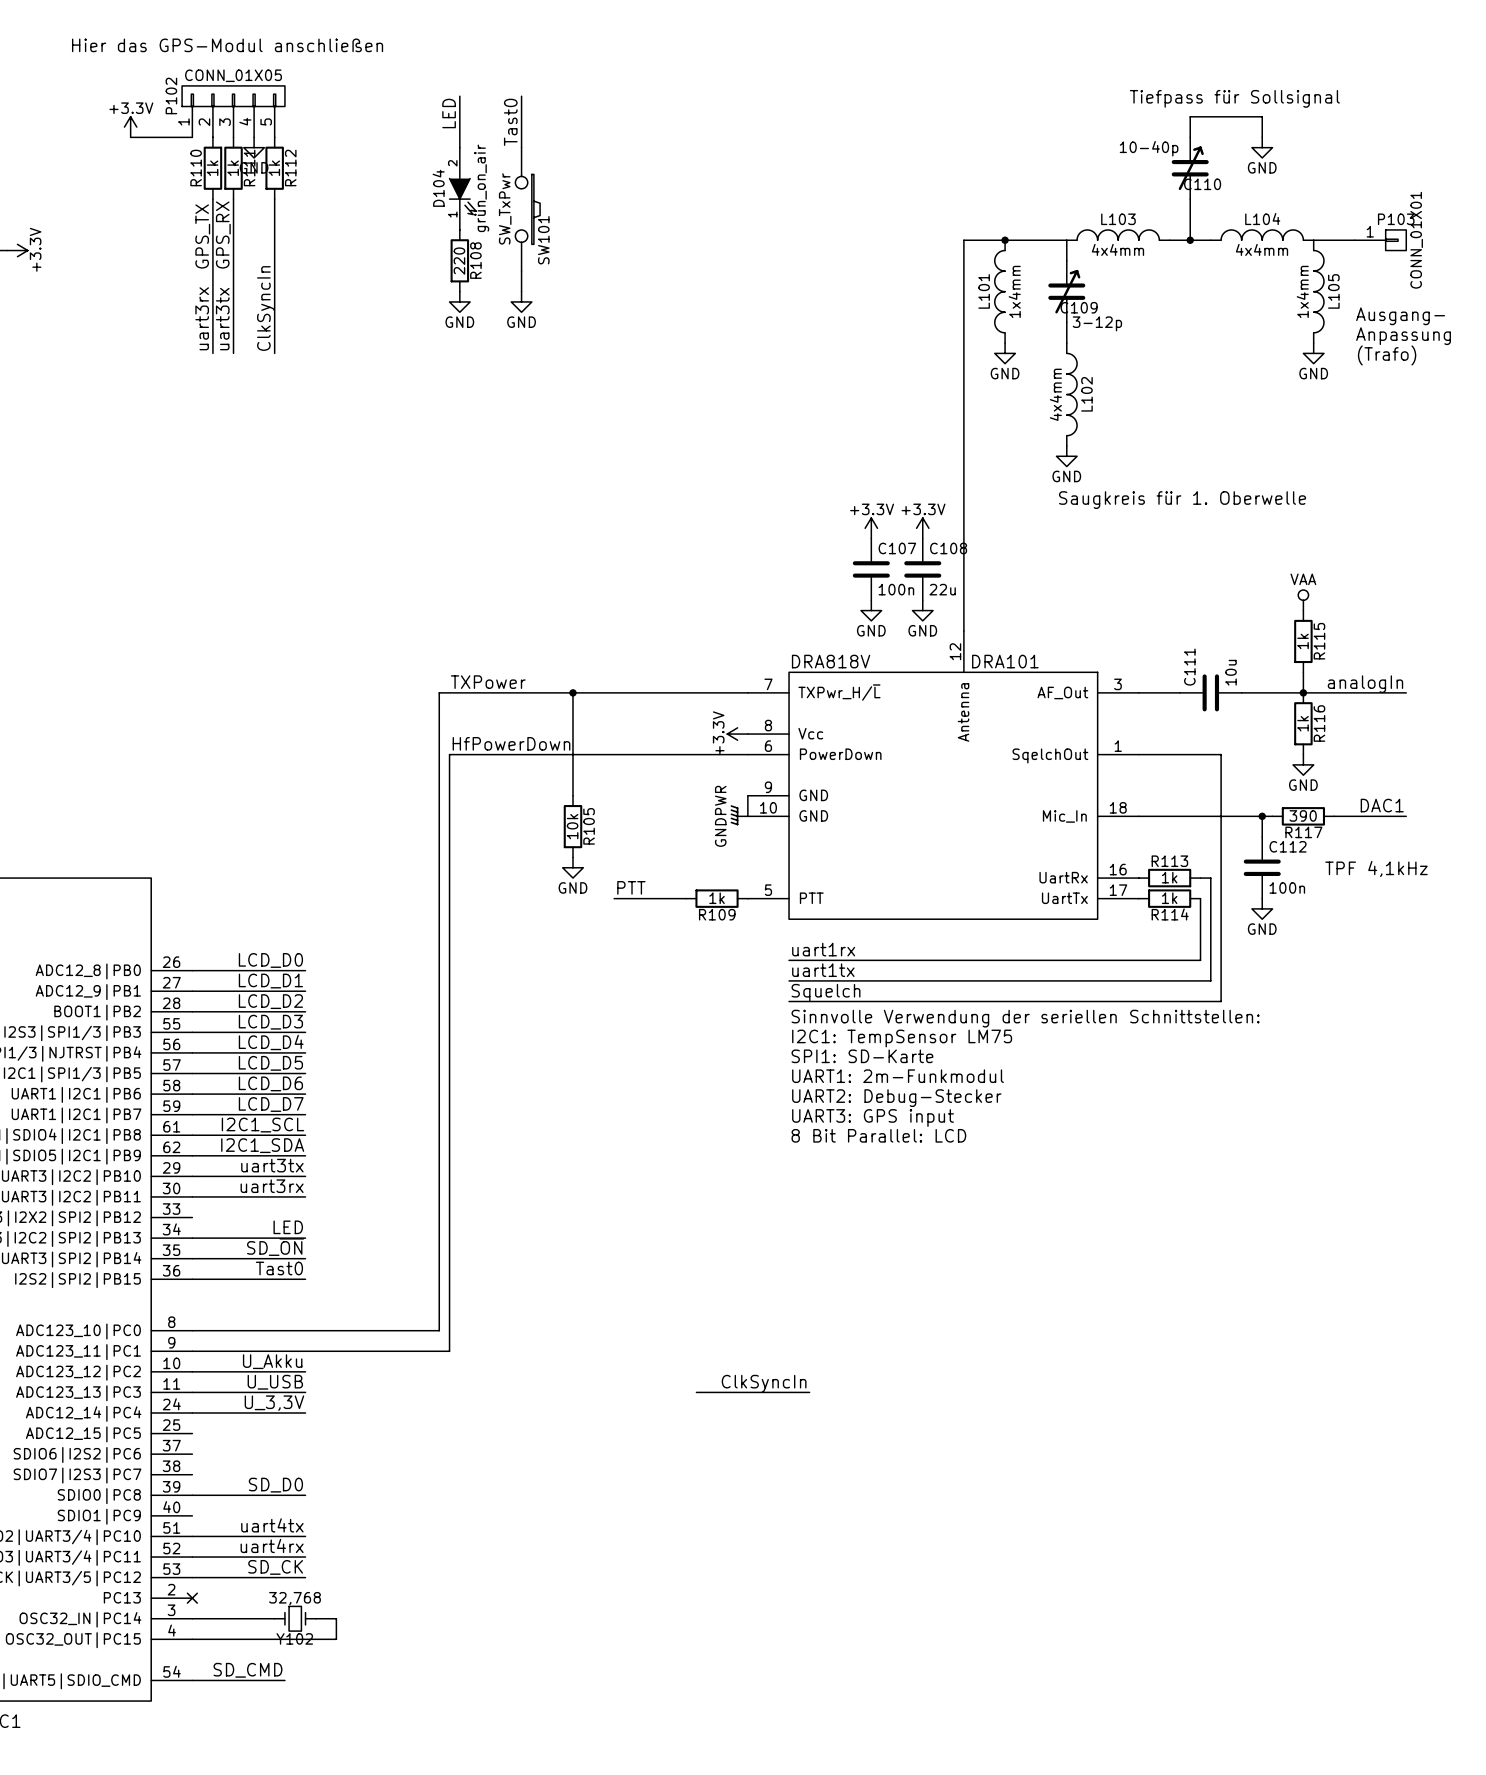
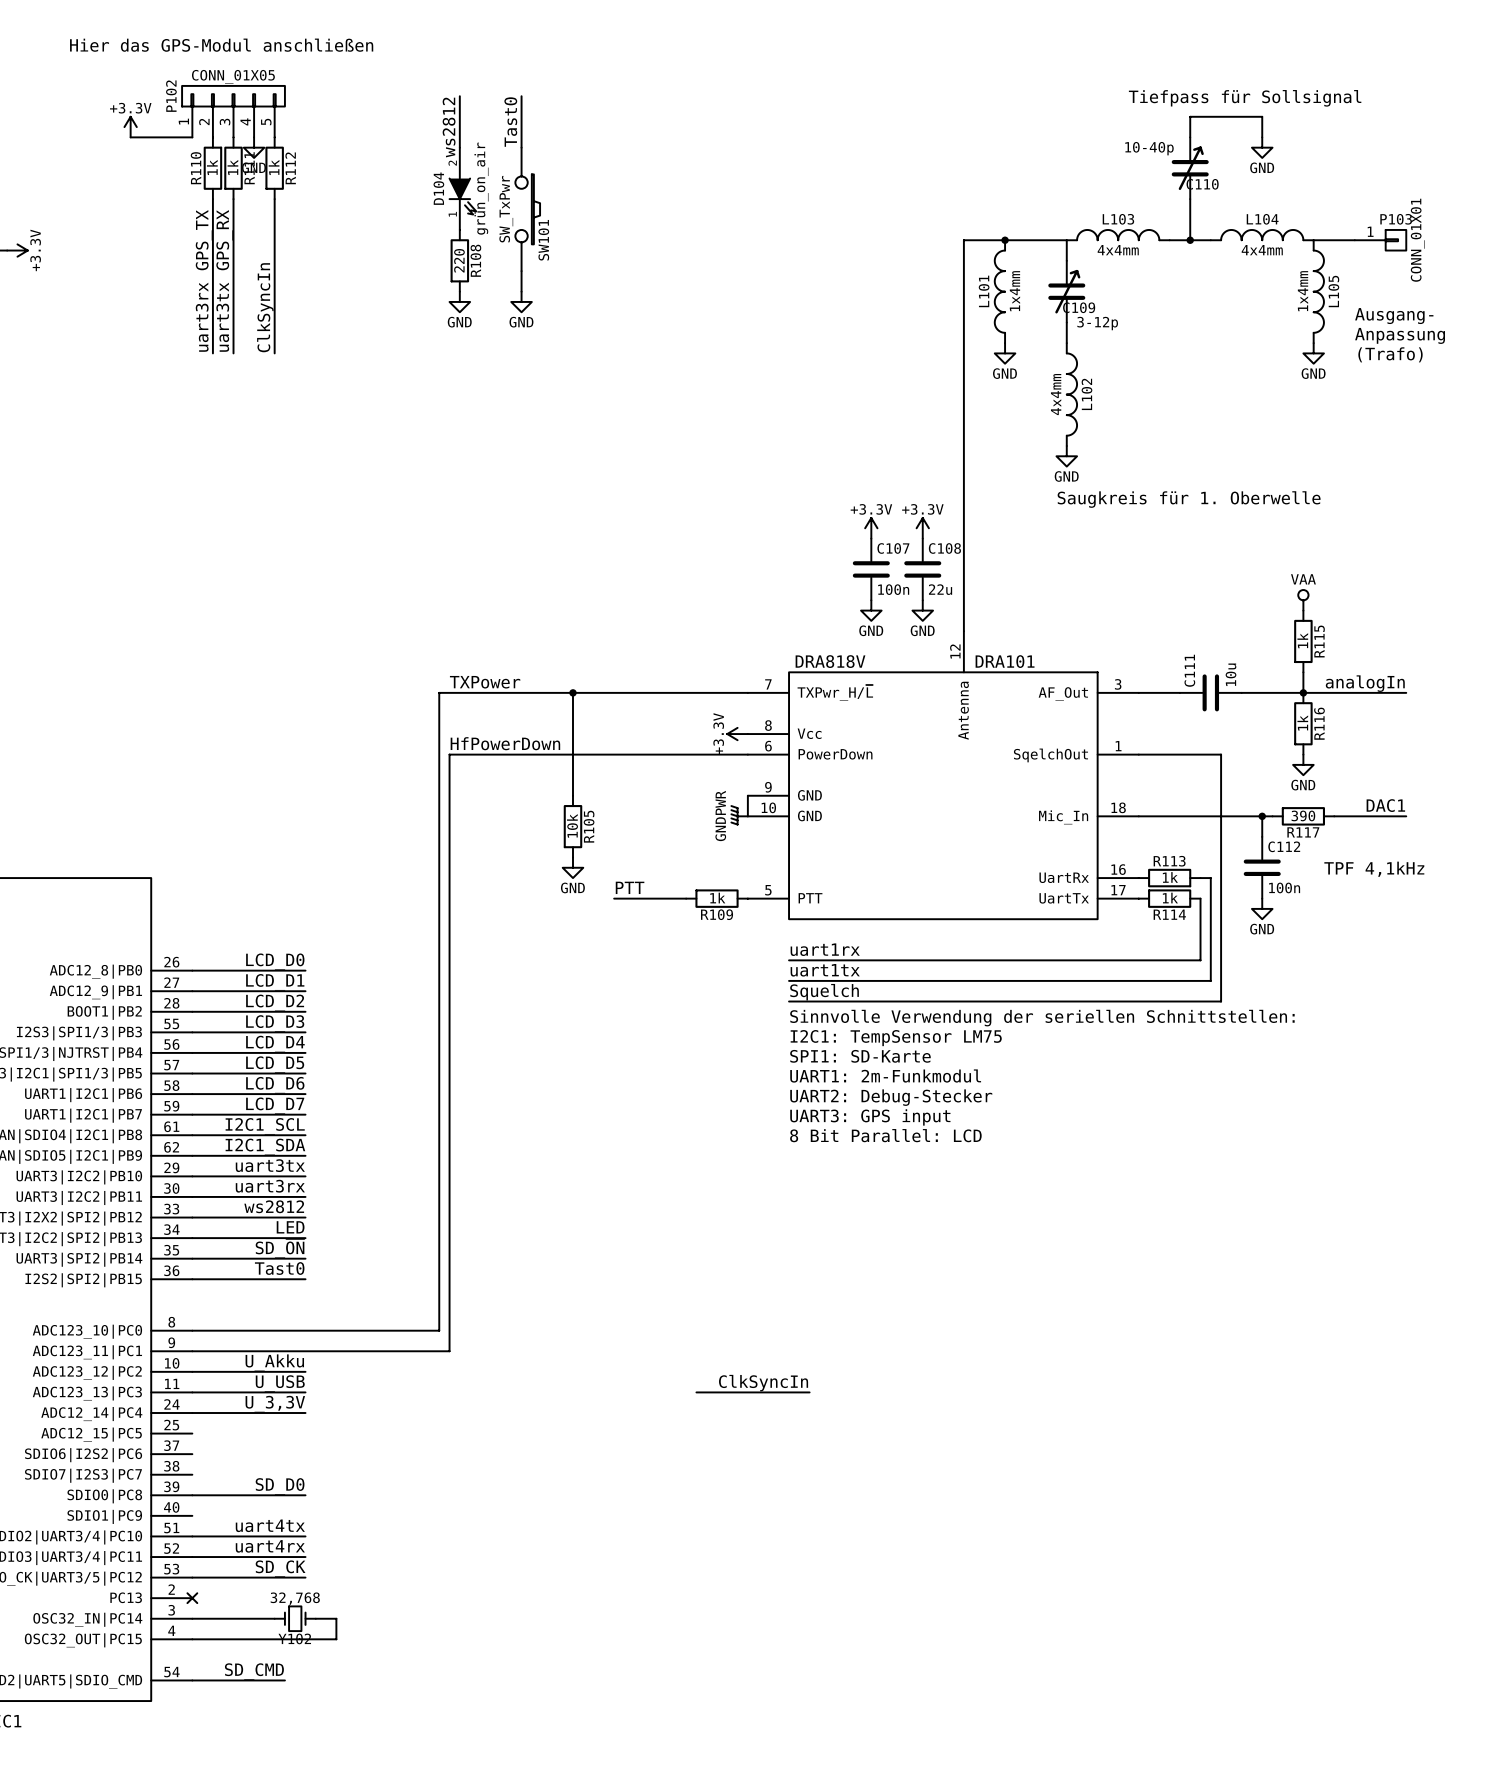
label: LED (449, 113) -> ws2812 (449, 127)
label: none -> ws2812 (274, 1206)
wire: none -> (192, 1217) (305, 1217)

